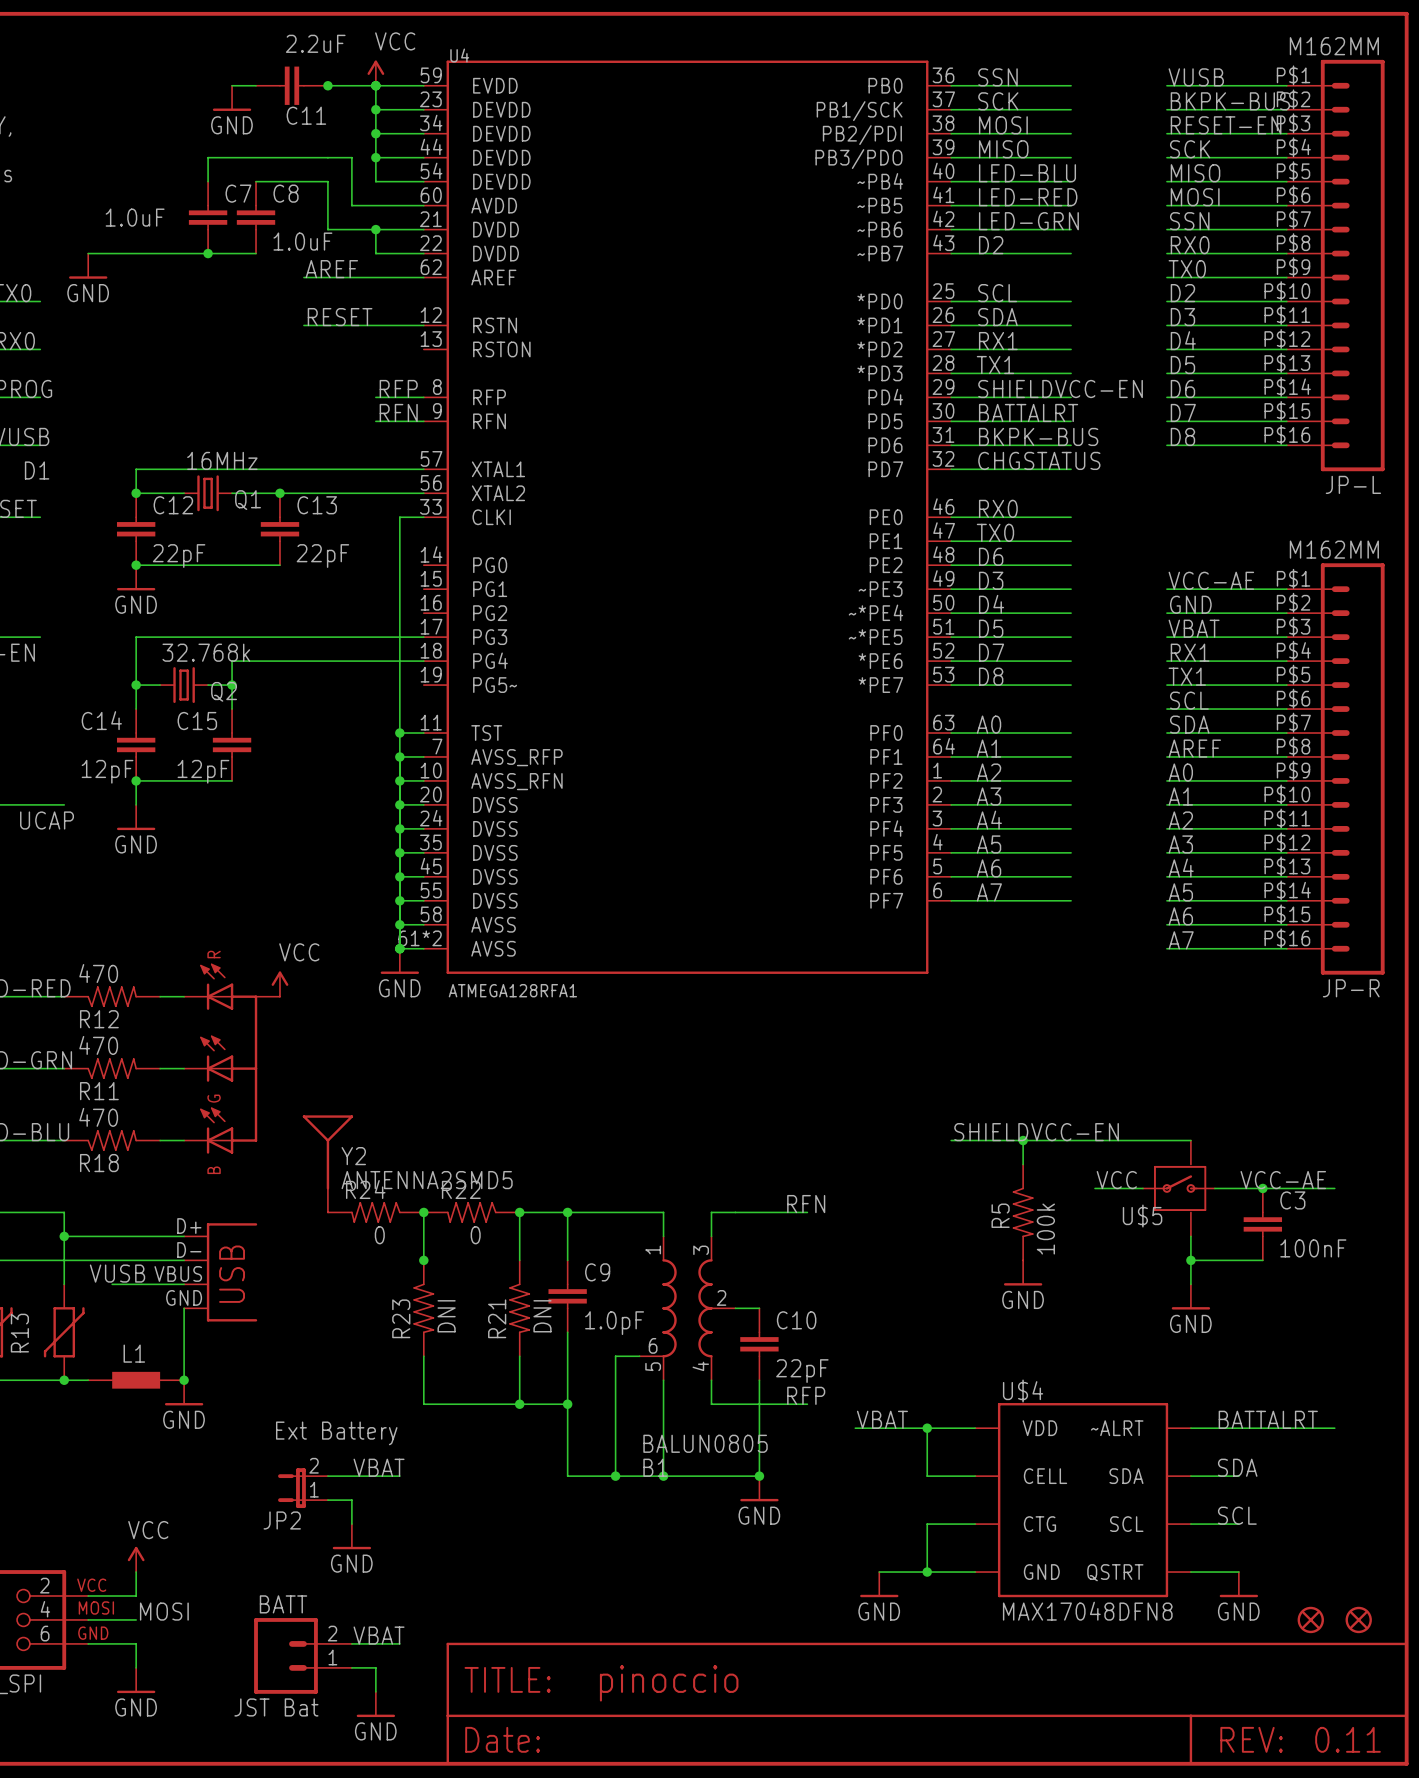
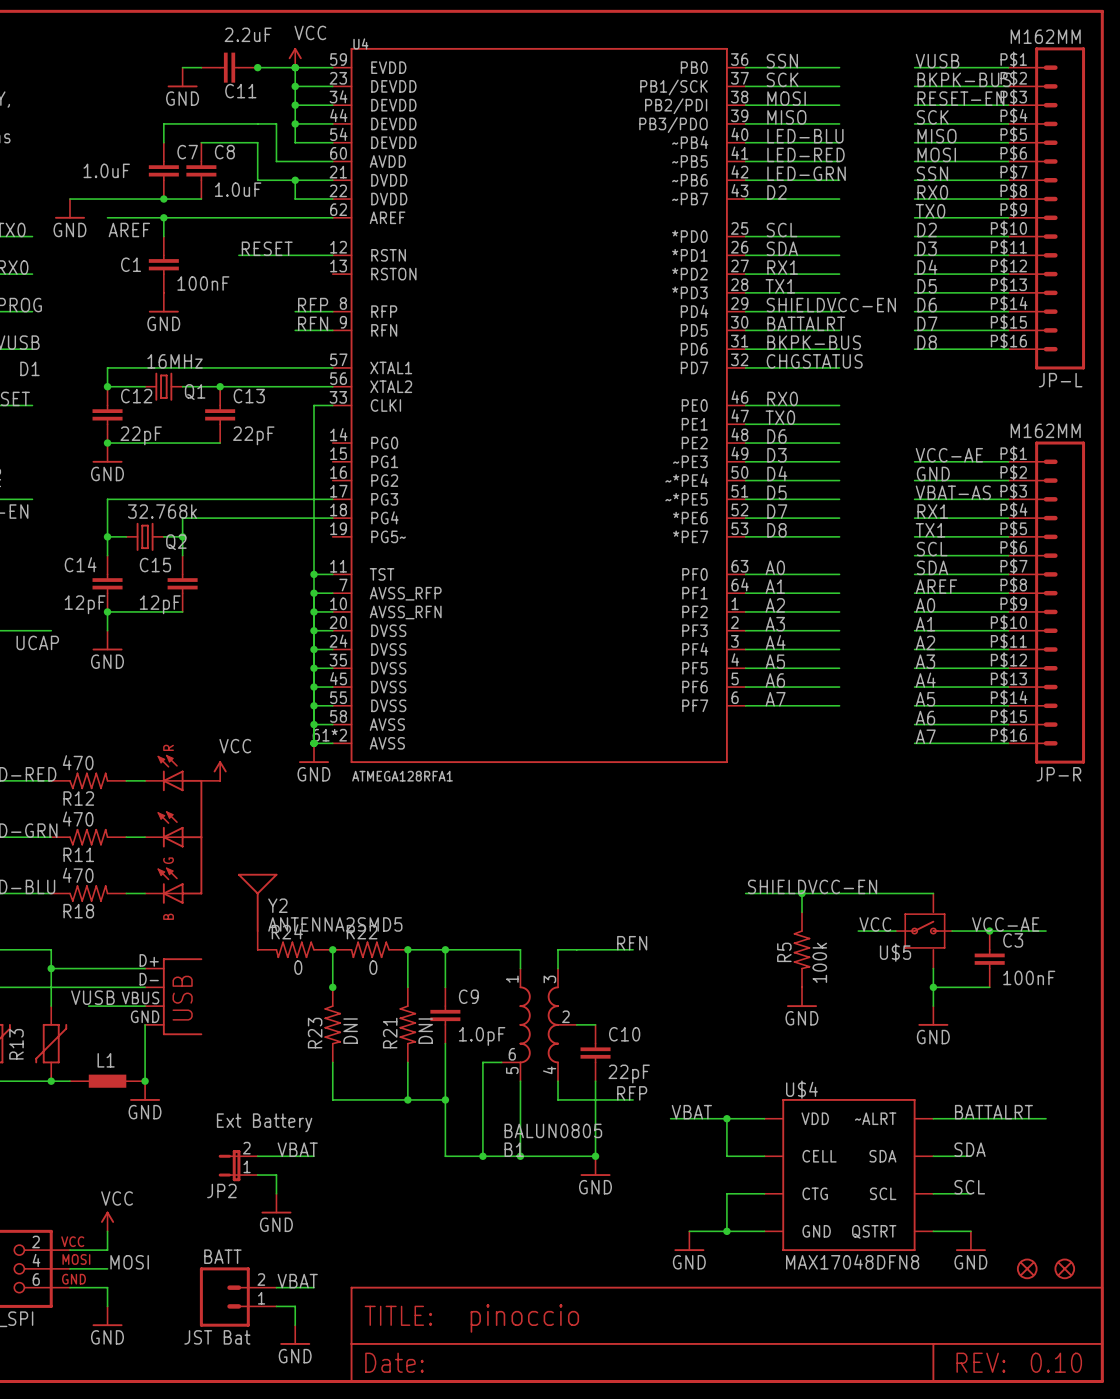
label position: AREF (331, 269) -> AREF (129, 230)
wire: none -> (107, 217) (238, 217)
wire: none -> (163, 217) (163, 236)
junction: none -> (163, 217)
C1: none -> 100nF (163, 264)
power symbol: none -> GND (163, 302)
label: VBAT (1194, 628) -> VBAT-AS (953, 492)
text: 0.11 (1348, 1739) -> 0.10 (1056, 1362)

